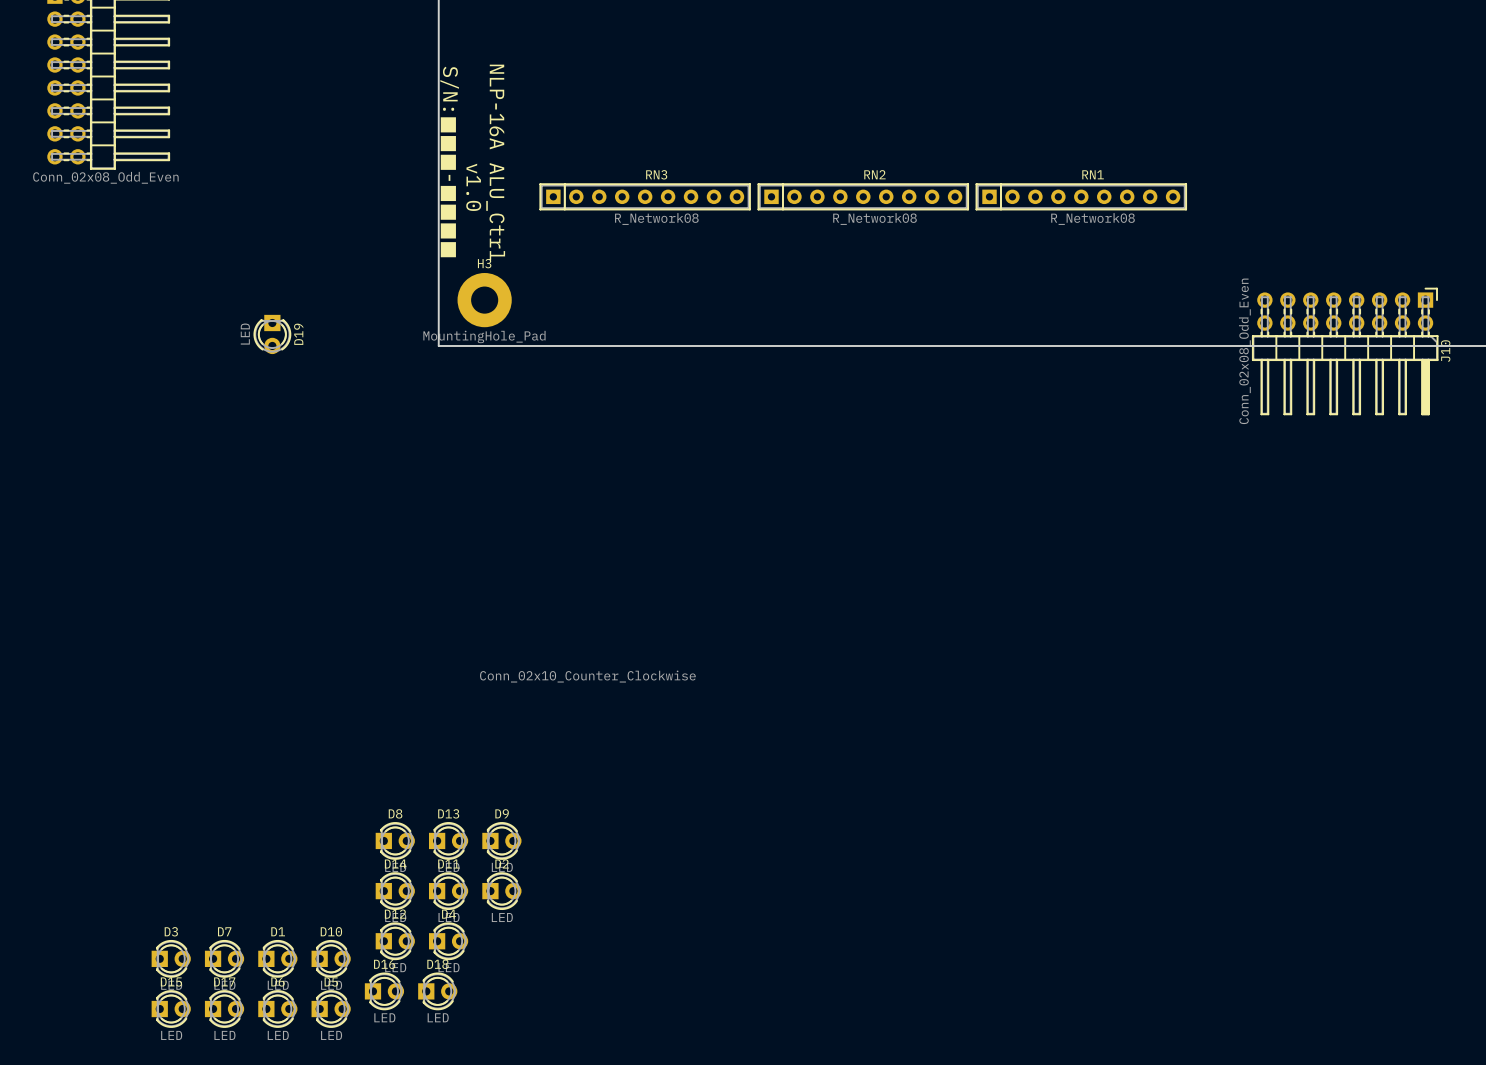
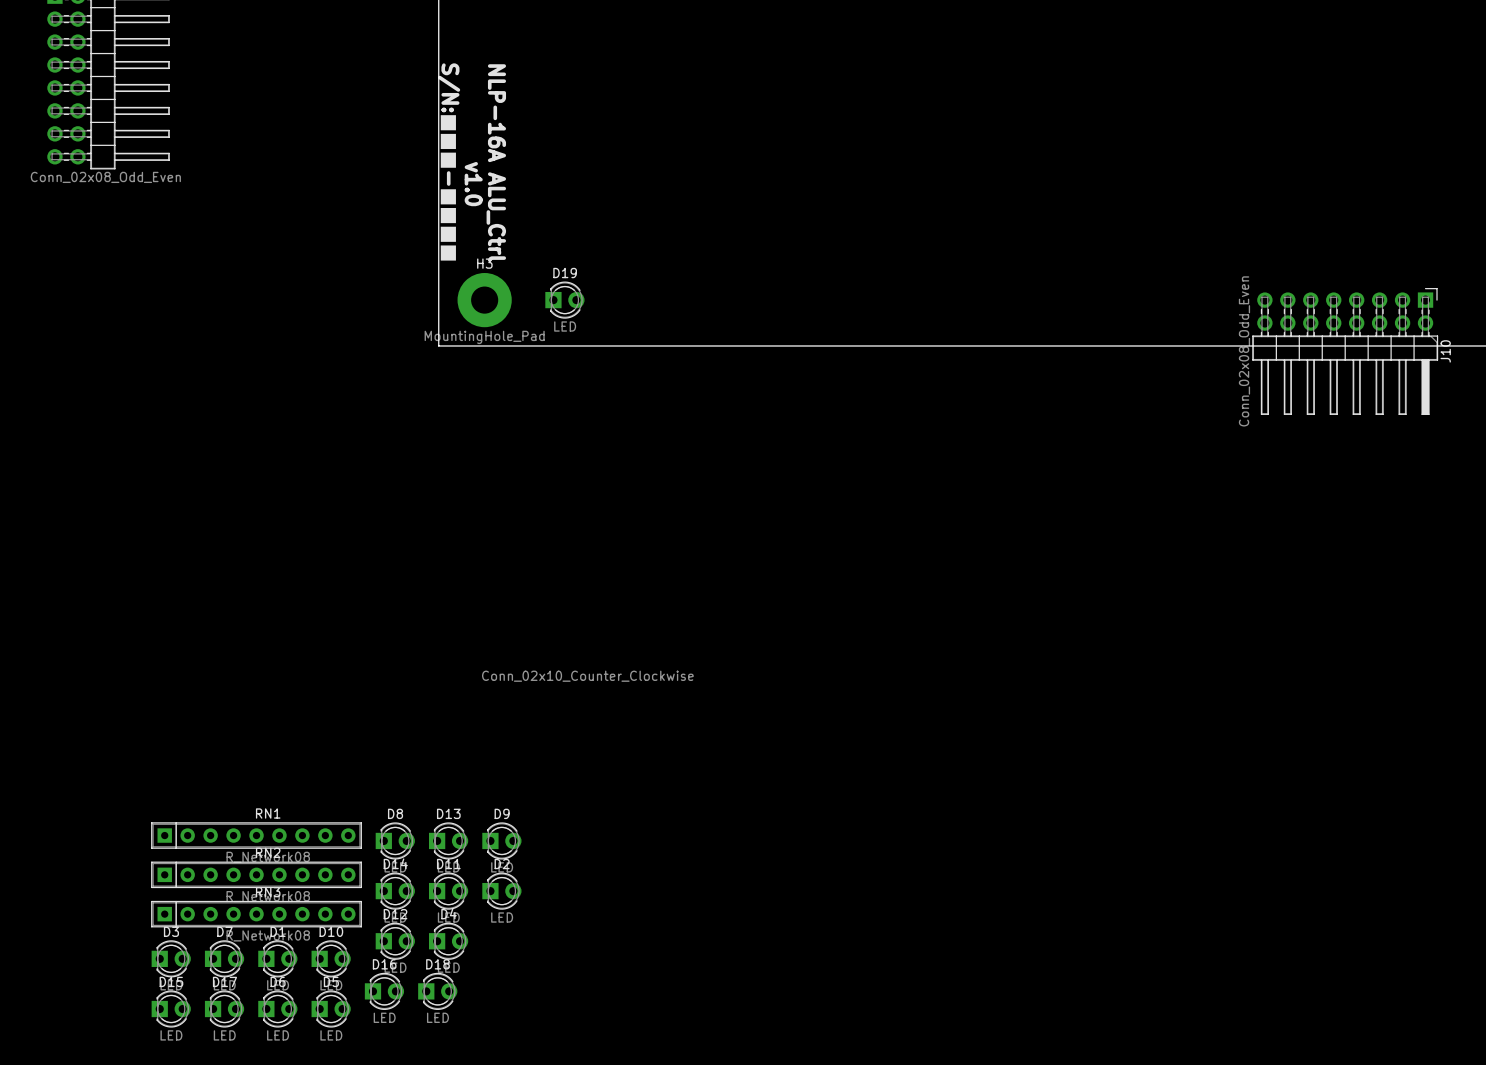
RN3 position: (645, 196) -> (256, 914)
RN2 position: (863, 196) -> (256, 874)
RN1 position: (1081, 196) -> (256, 835)
D19 rotation: 0° (272, 334) -> 90° counterclockwise (564, 300)
D19 position: (272, 334) -> (564, 300)

